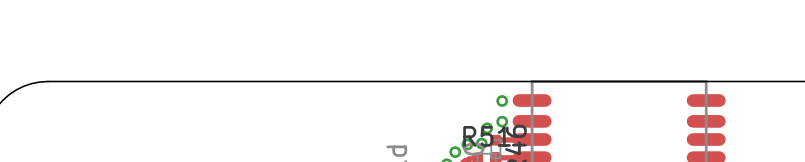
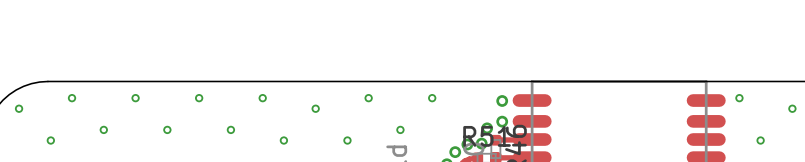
via: none -> (72, 98)
via: none -> (135, 98)
via: none -> (199, 98)
via: none -> (262, 98)
via: none -> (368, 98)
via: none -> (432, 98)
via: none -> (739, 98)
via: none -> (19, 108)
via: none -> (315, 108)
via: none -> (792, 108)
via: none -> (103, 129)
via: none -> (167, 129)
via: none -> (230, 129)
via: none -> (400, 129)
via: none -> (50, 140)
via: none -> (283, 140)
via: none -> (347, 140)
via: none -> (760, 140)

